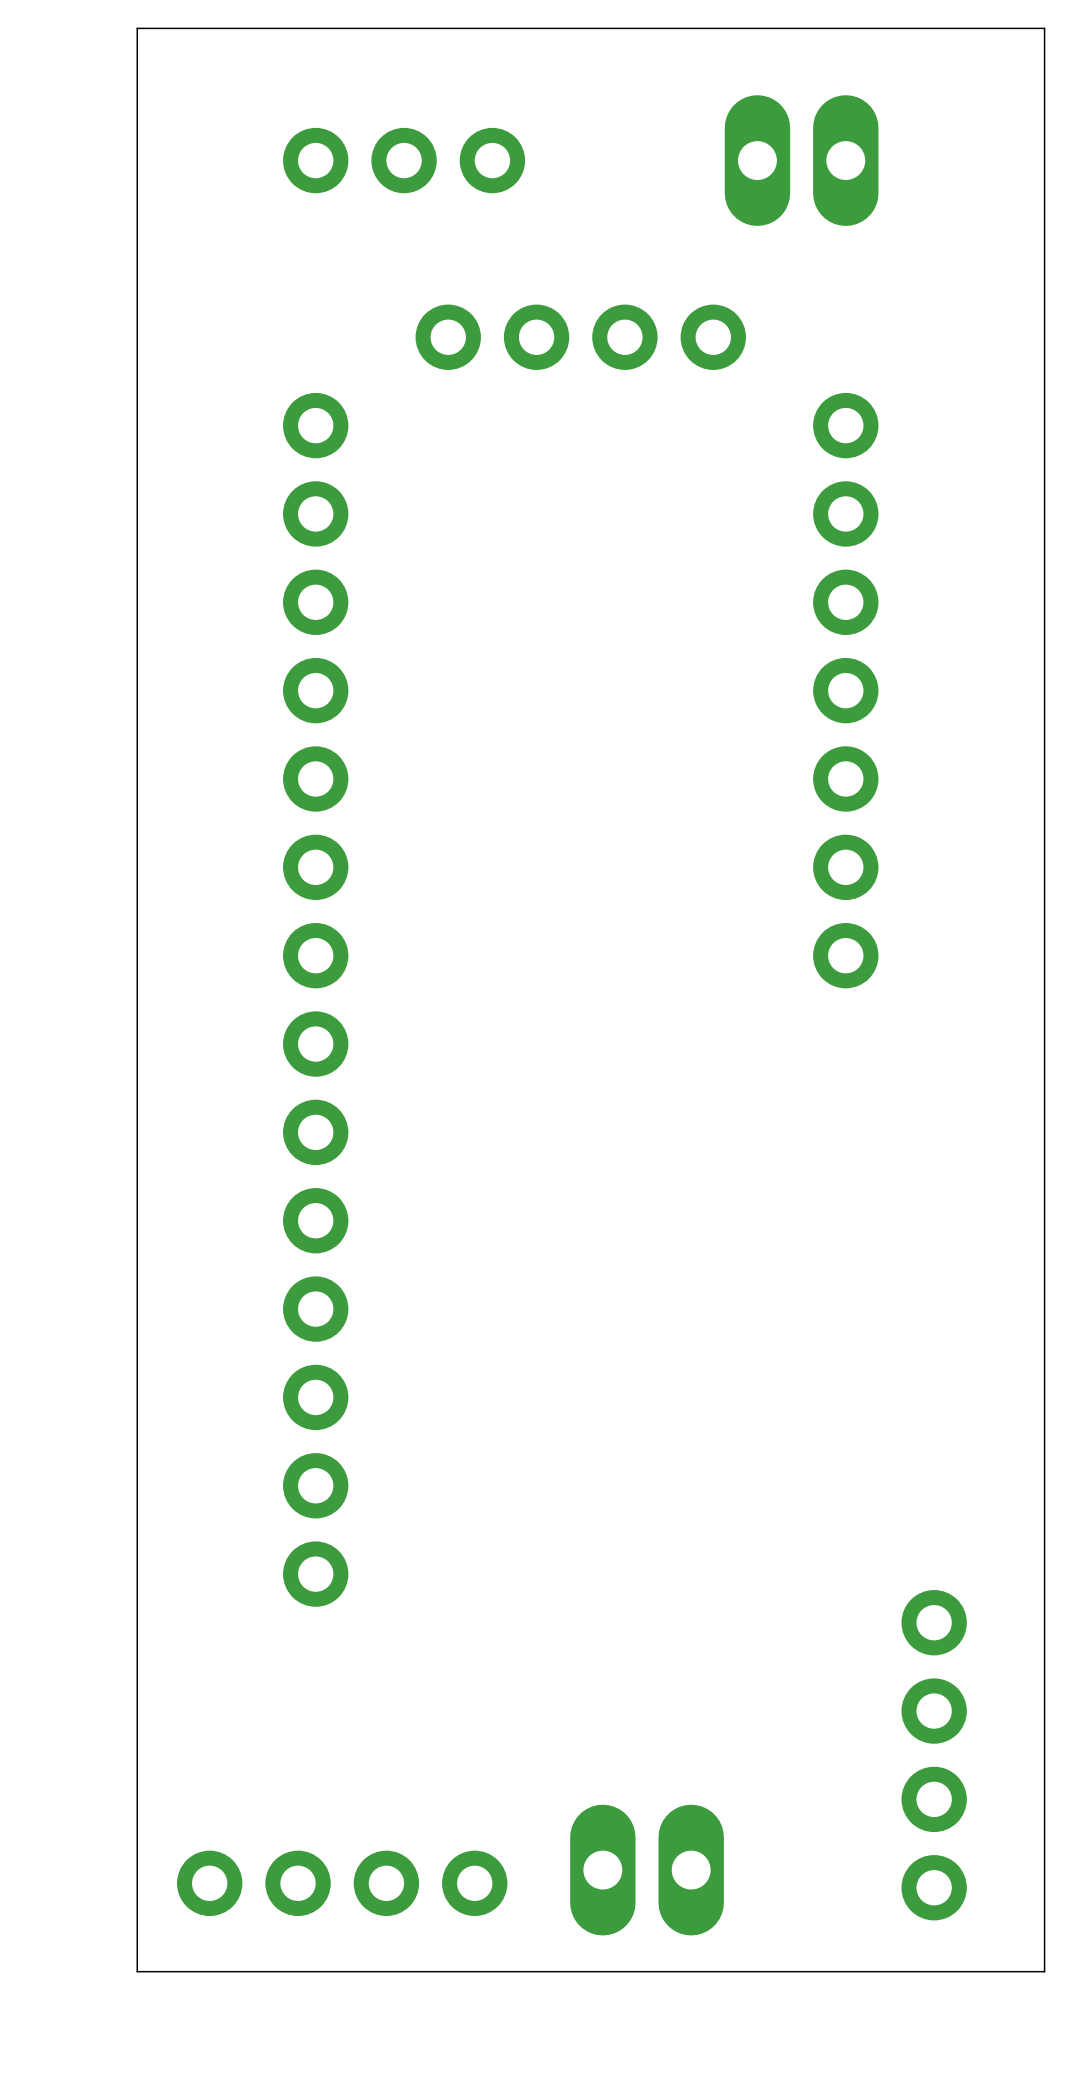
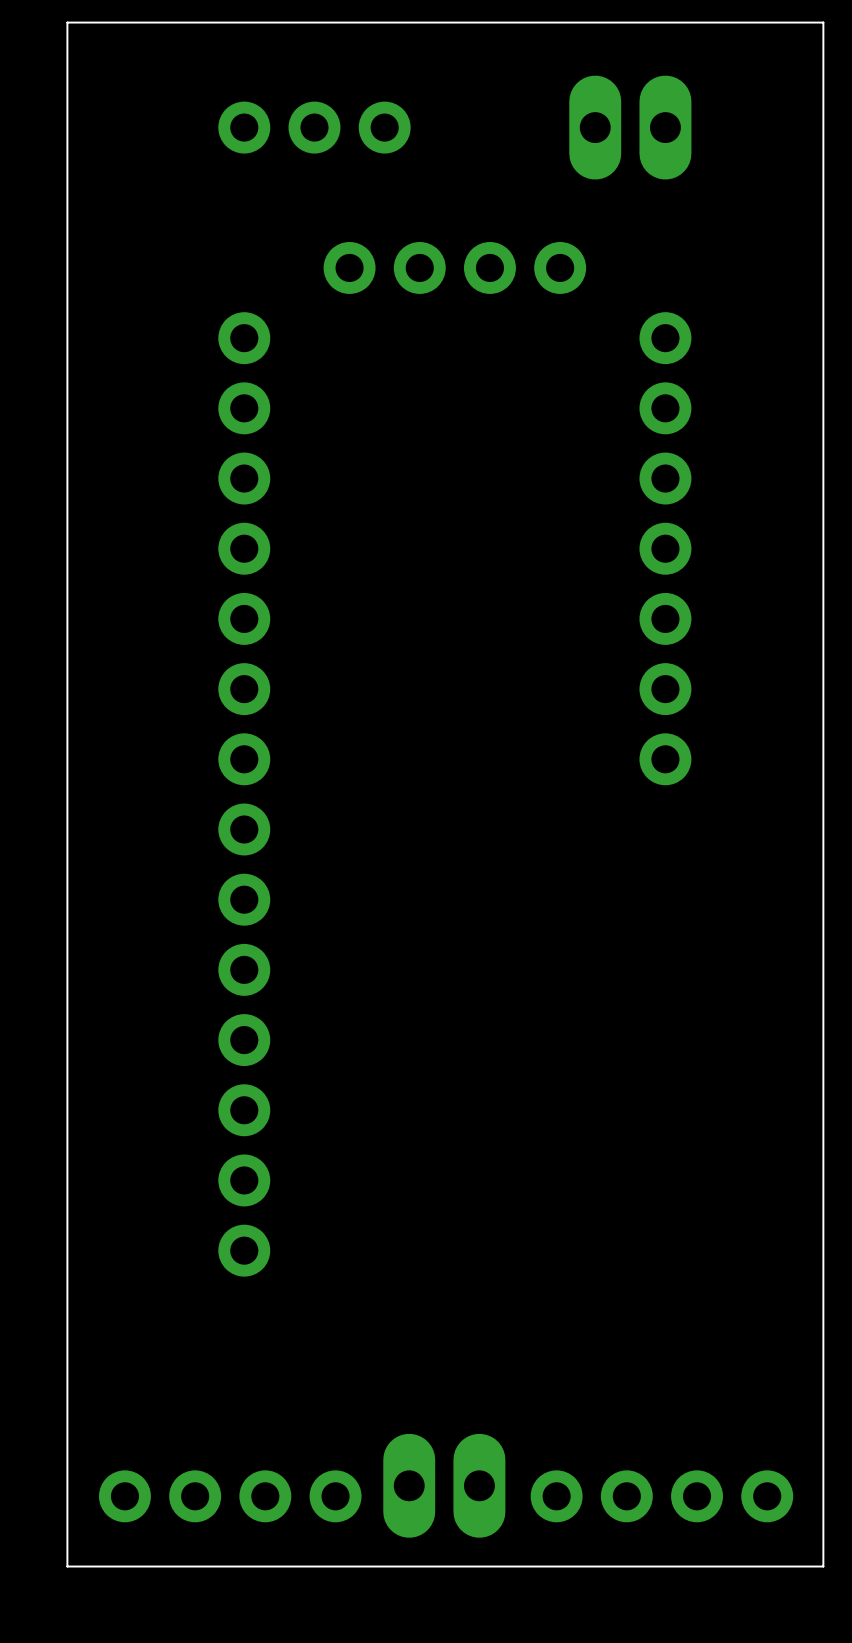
board edge: (137, 28) (137, 1971) -> (102, 22) (67, 22) (67, 1566) (102, 1566)
part rotation: 0° (934, 1755) -> 90° clockwise (661, 1496)
part position: (647, 1870) -> (444, 1485)
part position: (342, 1883) -> (230, 1496)

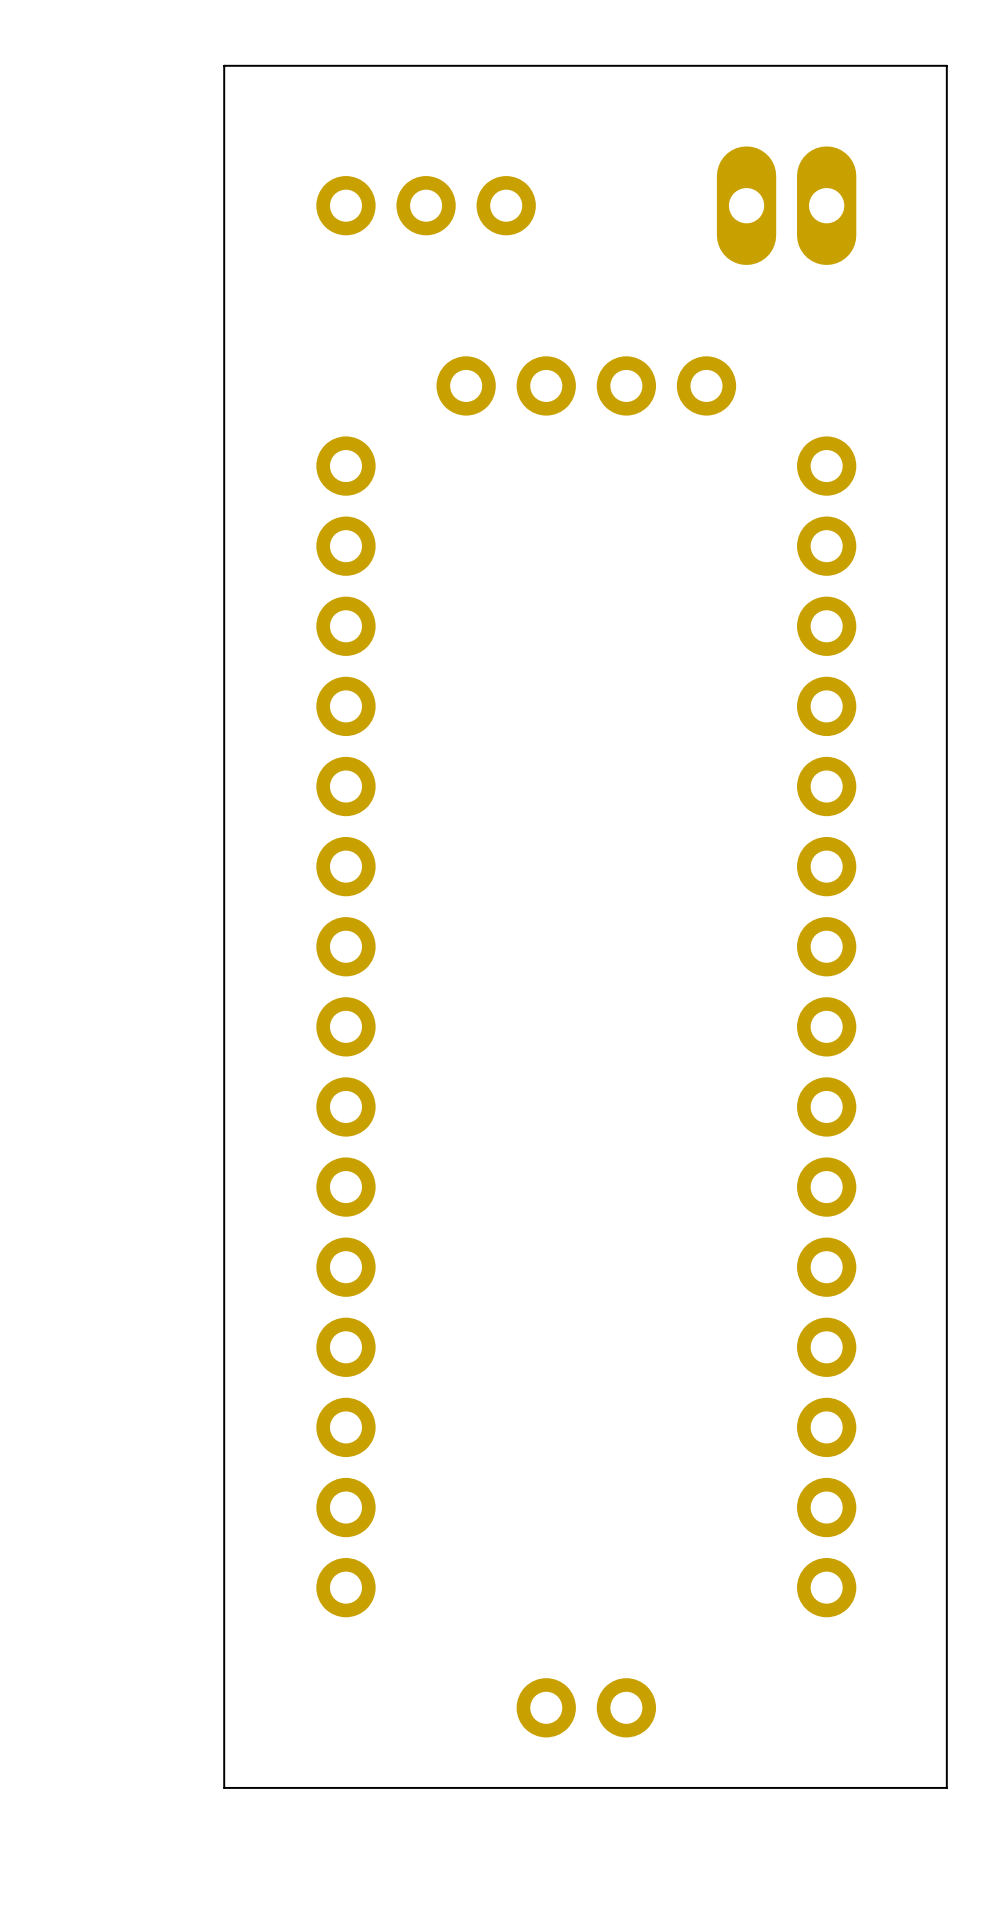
board edge: (823, 57) (823, 22) (67, 22) (67, 1566) (190, 1566) -> (946, 65) (224, 65) (224, 1787)
part position: (314, 127) -> (426, 205)
part position: (630, 127) -> (786, 205)
part position: (454, 267) -> (586, 385)
part position: (665, 548) -> (826, 706)
part: (244, 794) -> none
part: none -> (345, 1026)
part: none -> (826, 1307)
part: (444, 1485) -> none
part: (230, 1496) -> none
part: none -> (586, 1707)
part: (661, 1496) -> none

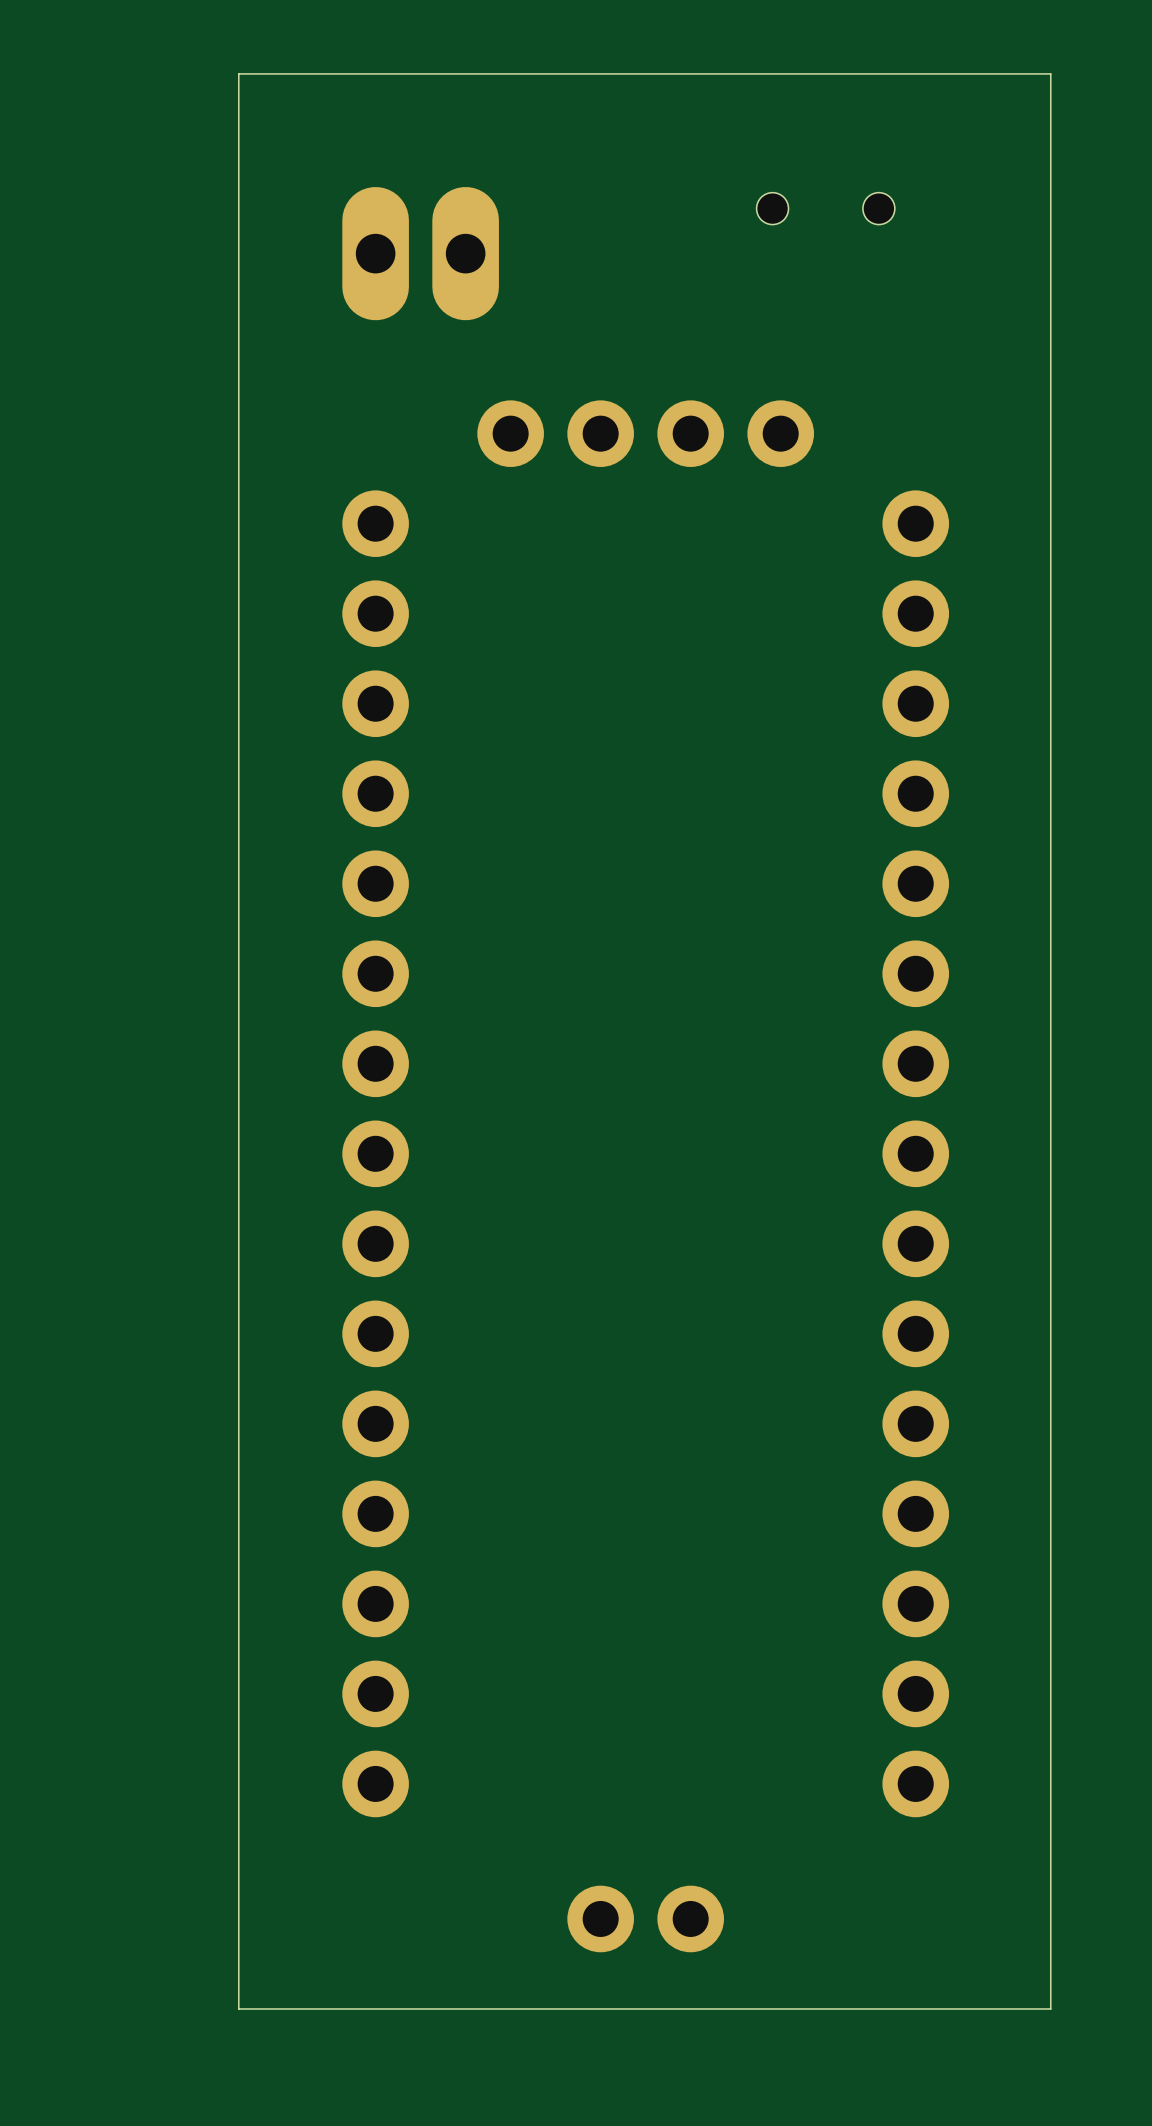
part: none -> (825, 208)
part: (426, 205) -> none
part position: (786, 205) -> (420, 253)

